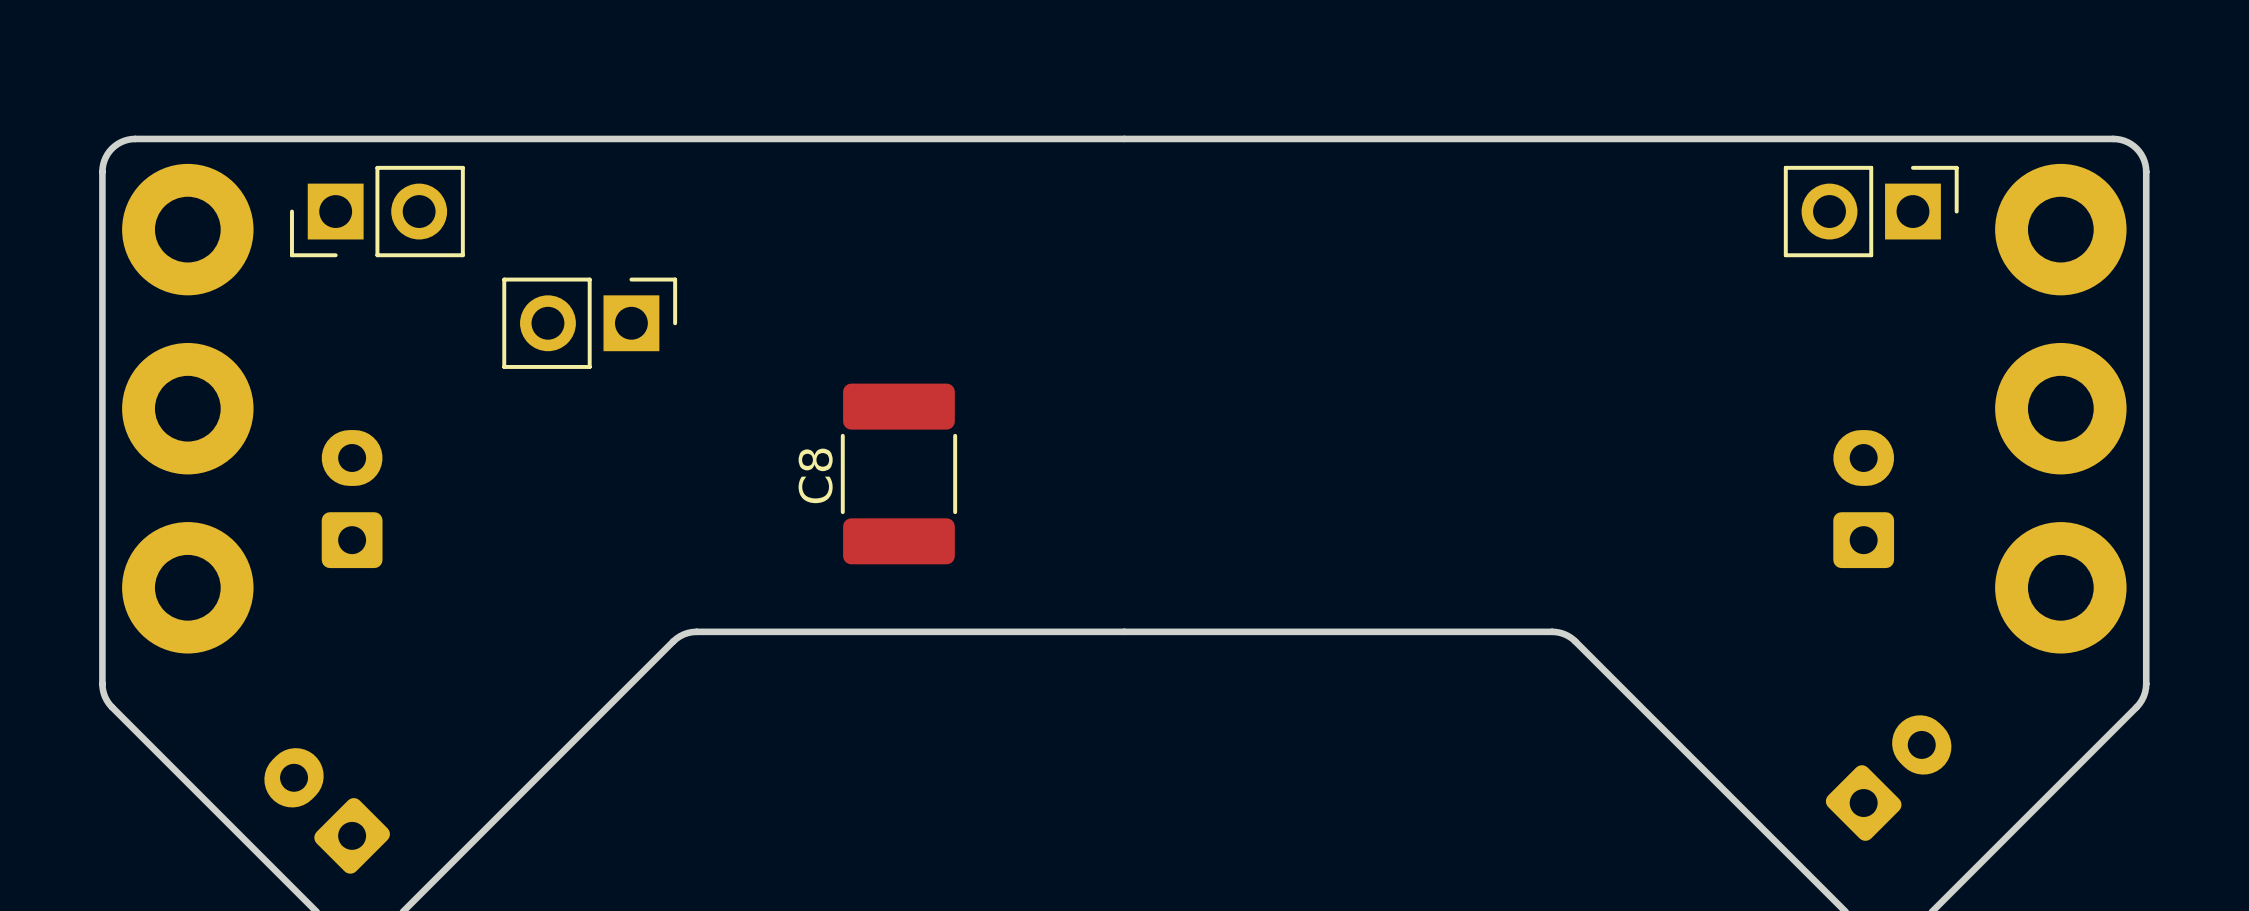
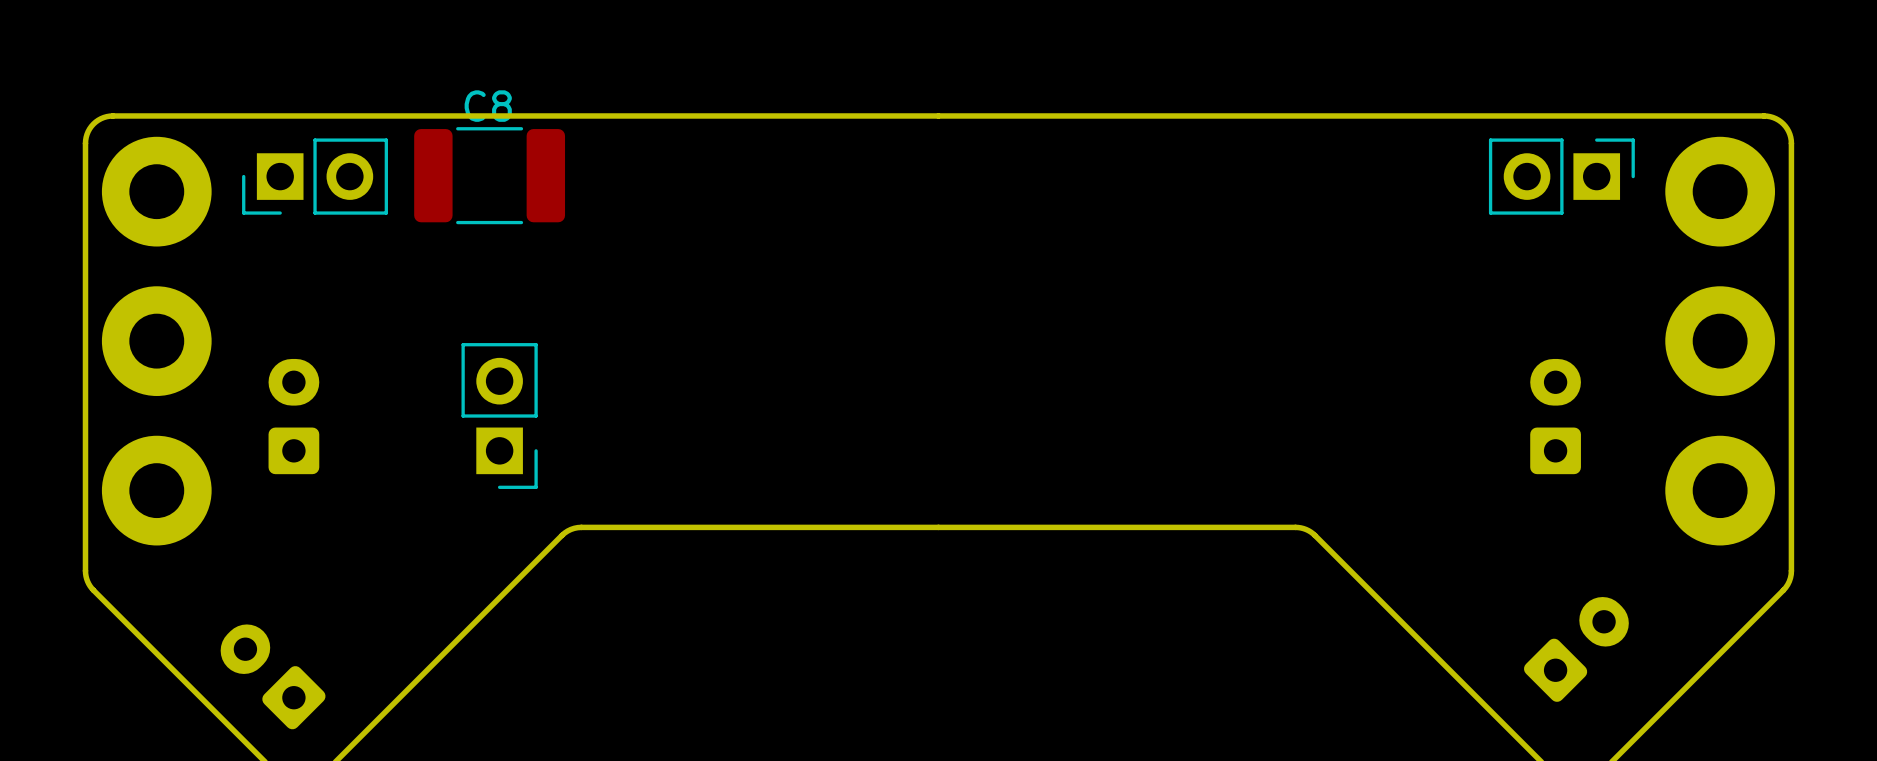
part rotation: 0° (589, 323) -> 90° clockwise (499, 416)
part position: (589, 323) -> (499, 416)
C8 rotation: 0° (898, 473) -> 90° clockwise (489, 175)
C8 position: (898, 473) -> (489, 175)

